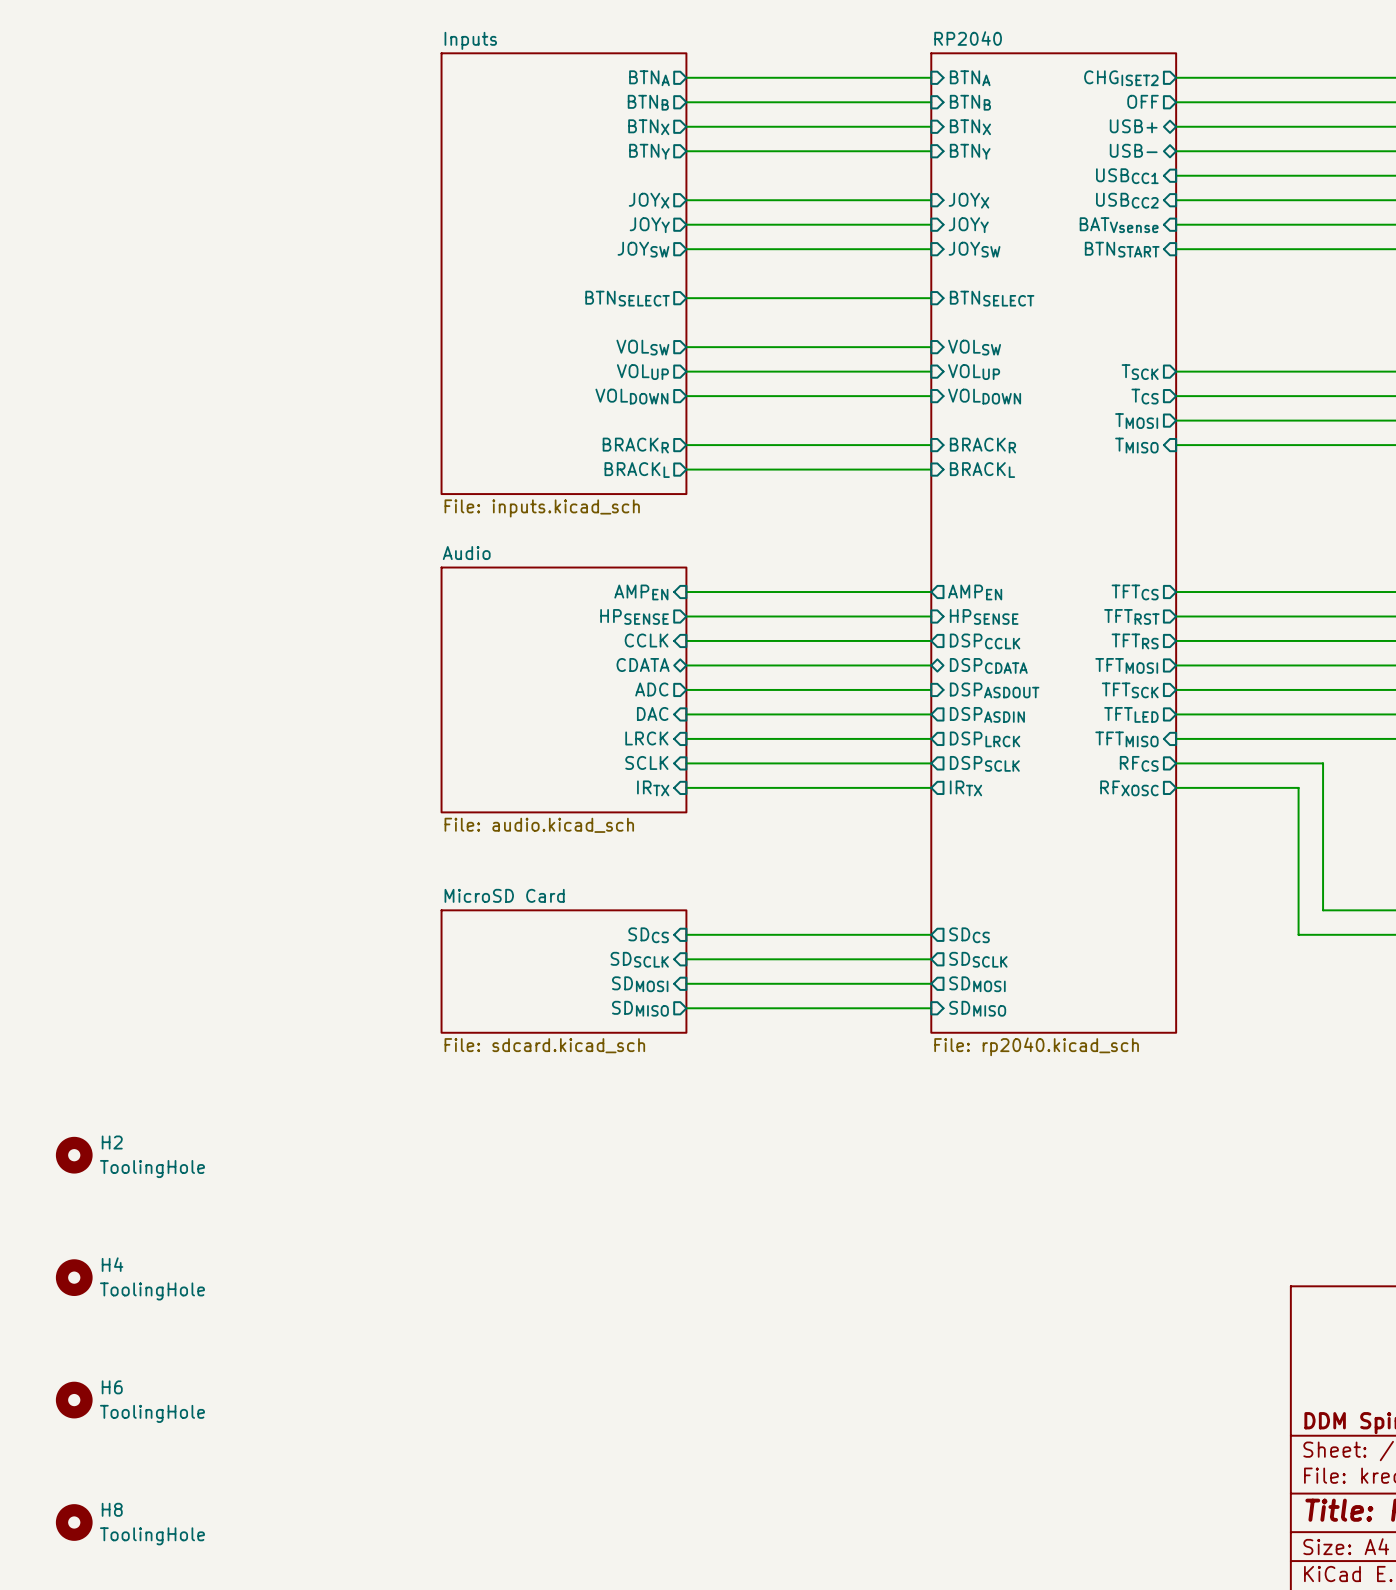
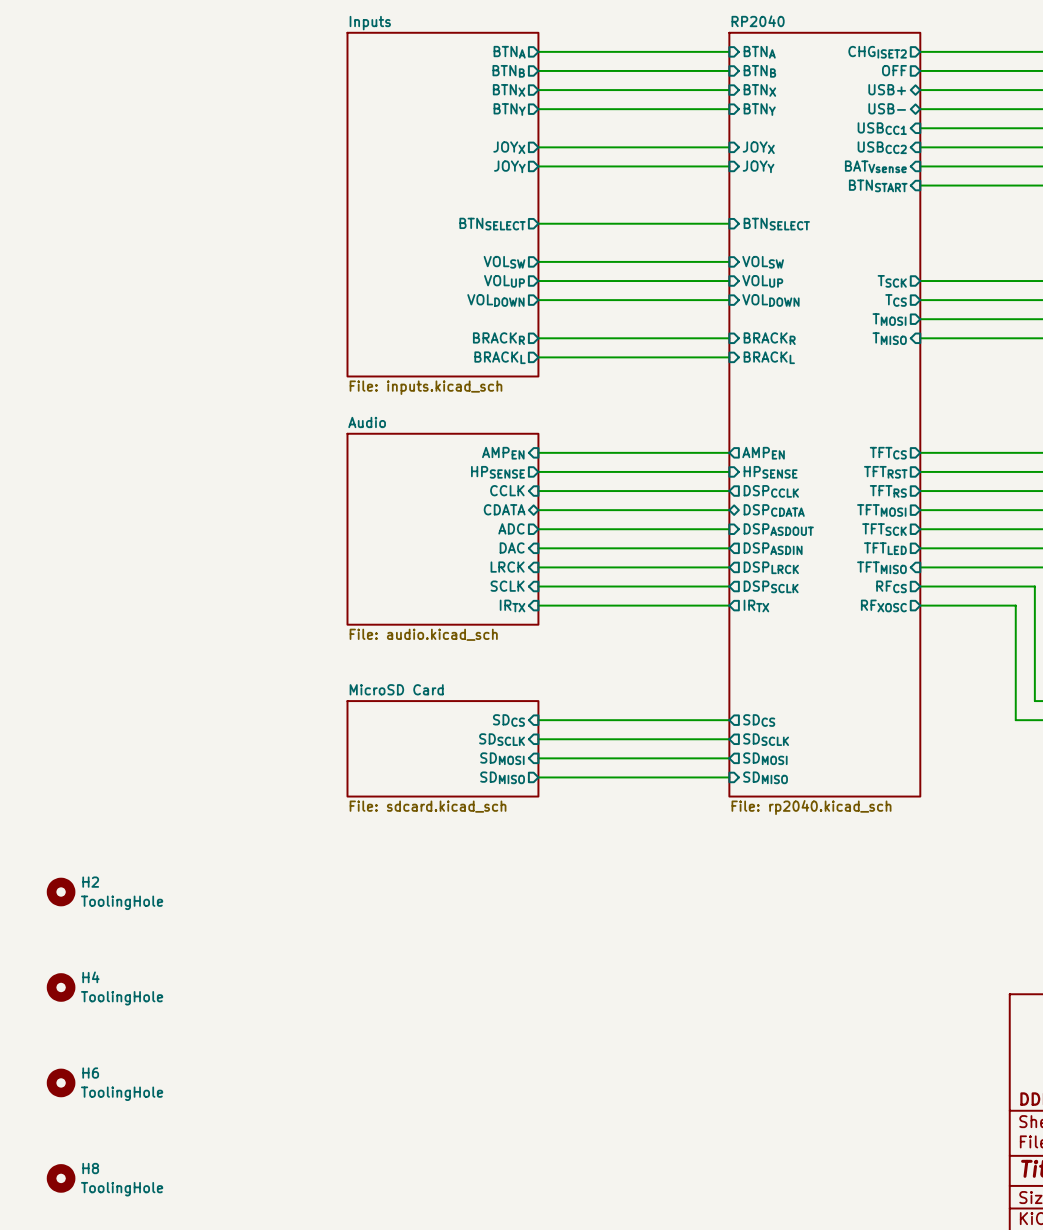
sheet pin: JOYSW (643, 249) -> none
wire: (686, 249) (931, 249) -> none
sheet pin: JOYSW (974, 249) -> none

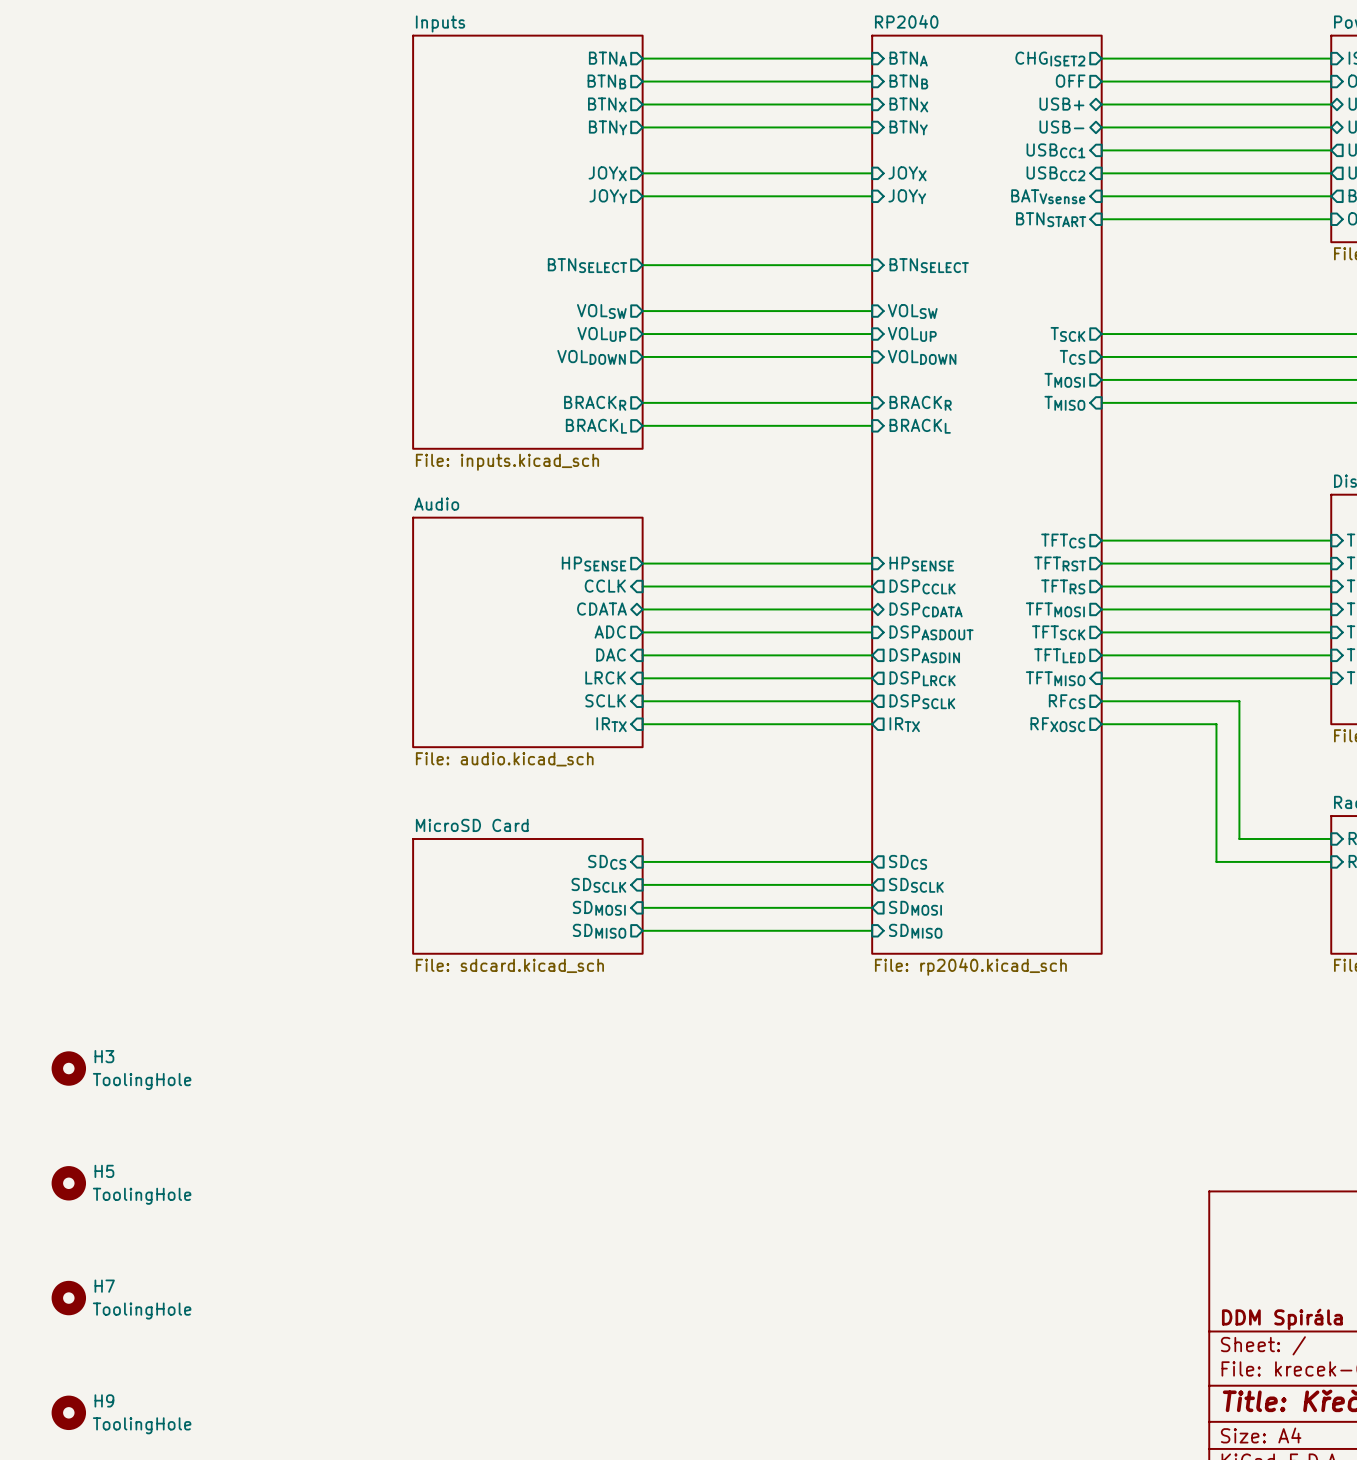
wire: (538, 452) (729, 452) -> none
sheet pin: AMPEN (503, 453) -> none
sheet pin: AMPEN (763, 453) -> none
H2 name: H2 (90, 882) -> H3 (104, 1056)
H4 name: H4 (90, 977) -> H5 (104, 1171)
H6 name: H6 (90, 1073) -> H7 (104, 1286)
H8 name: H8 (90, 1168) -> H9 (104, 1400)

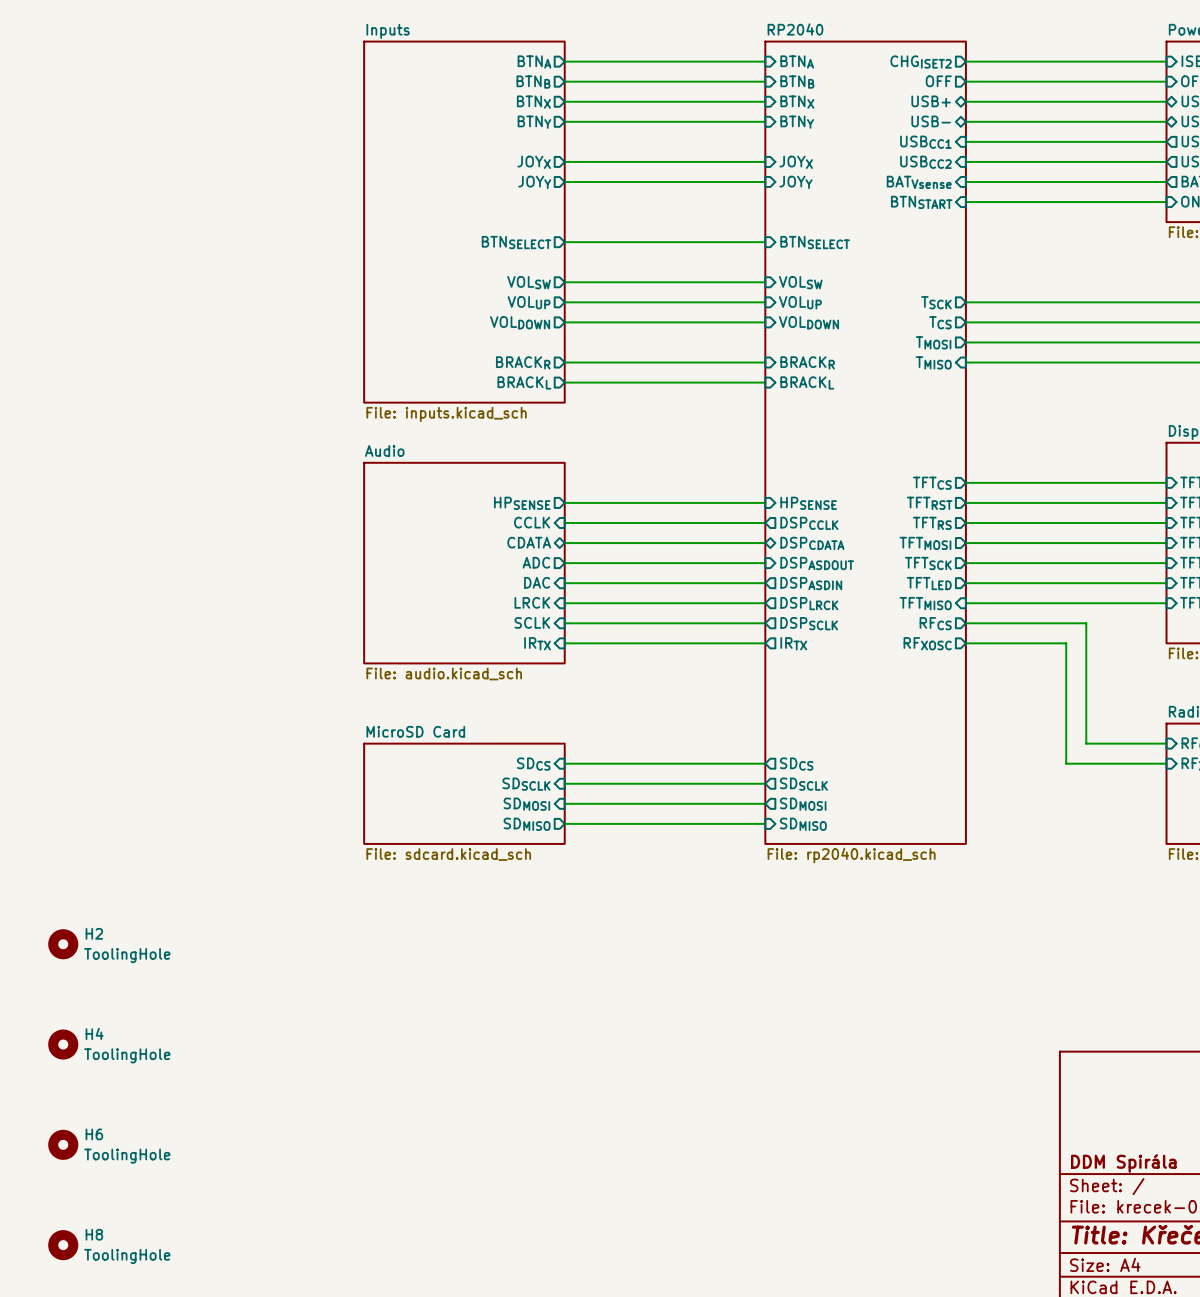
H3 name: H3 (104, 1056) -> H2 (94, 933)
H5 name: H5 (104, 1171) -> H4 (94, 1033)
H7 name: H7 (104, 1286) -> H6 (94, 1134)
H9 name: H9 (104, 1400) -> H8 (94, 1234)

